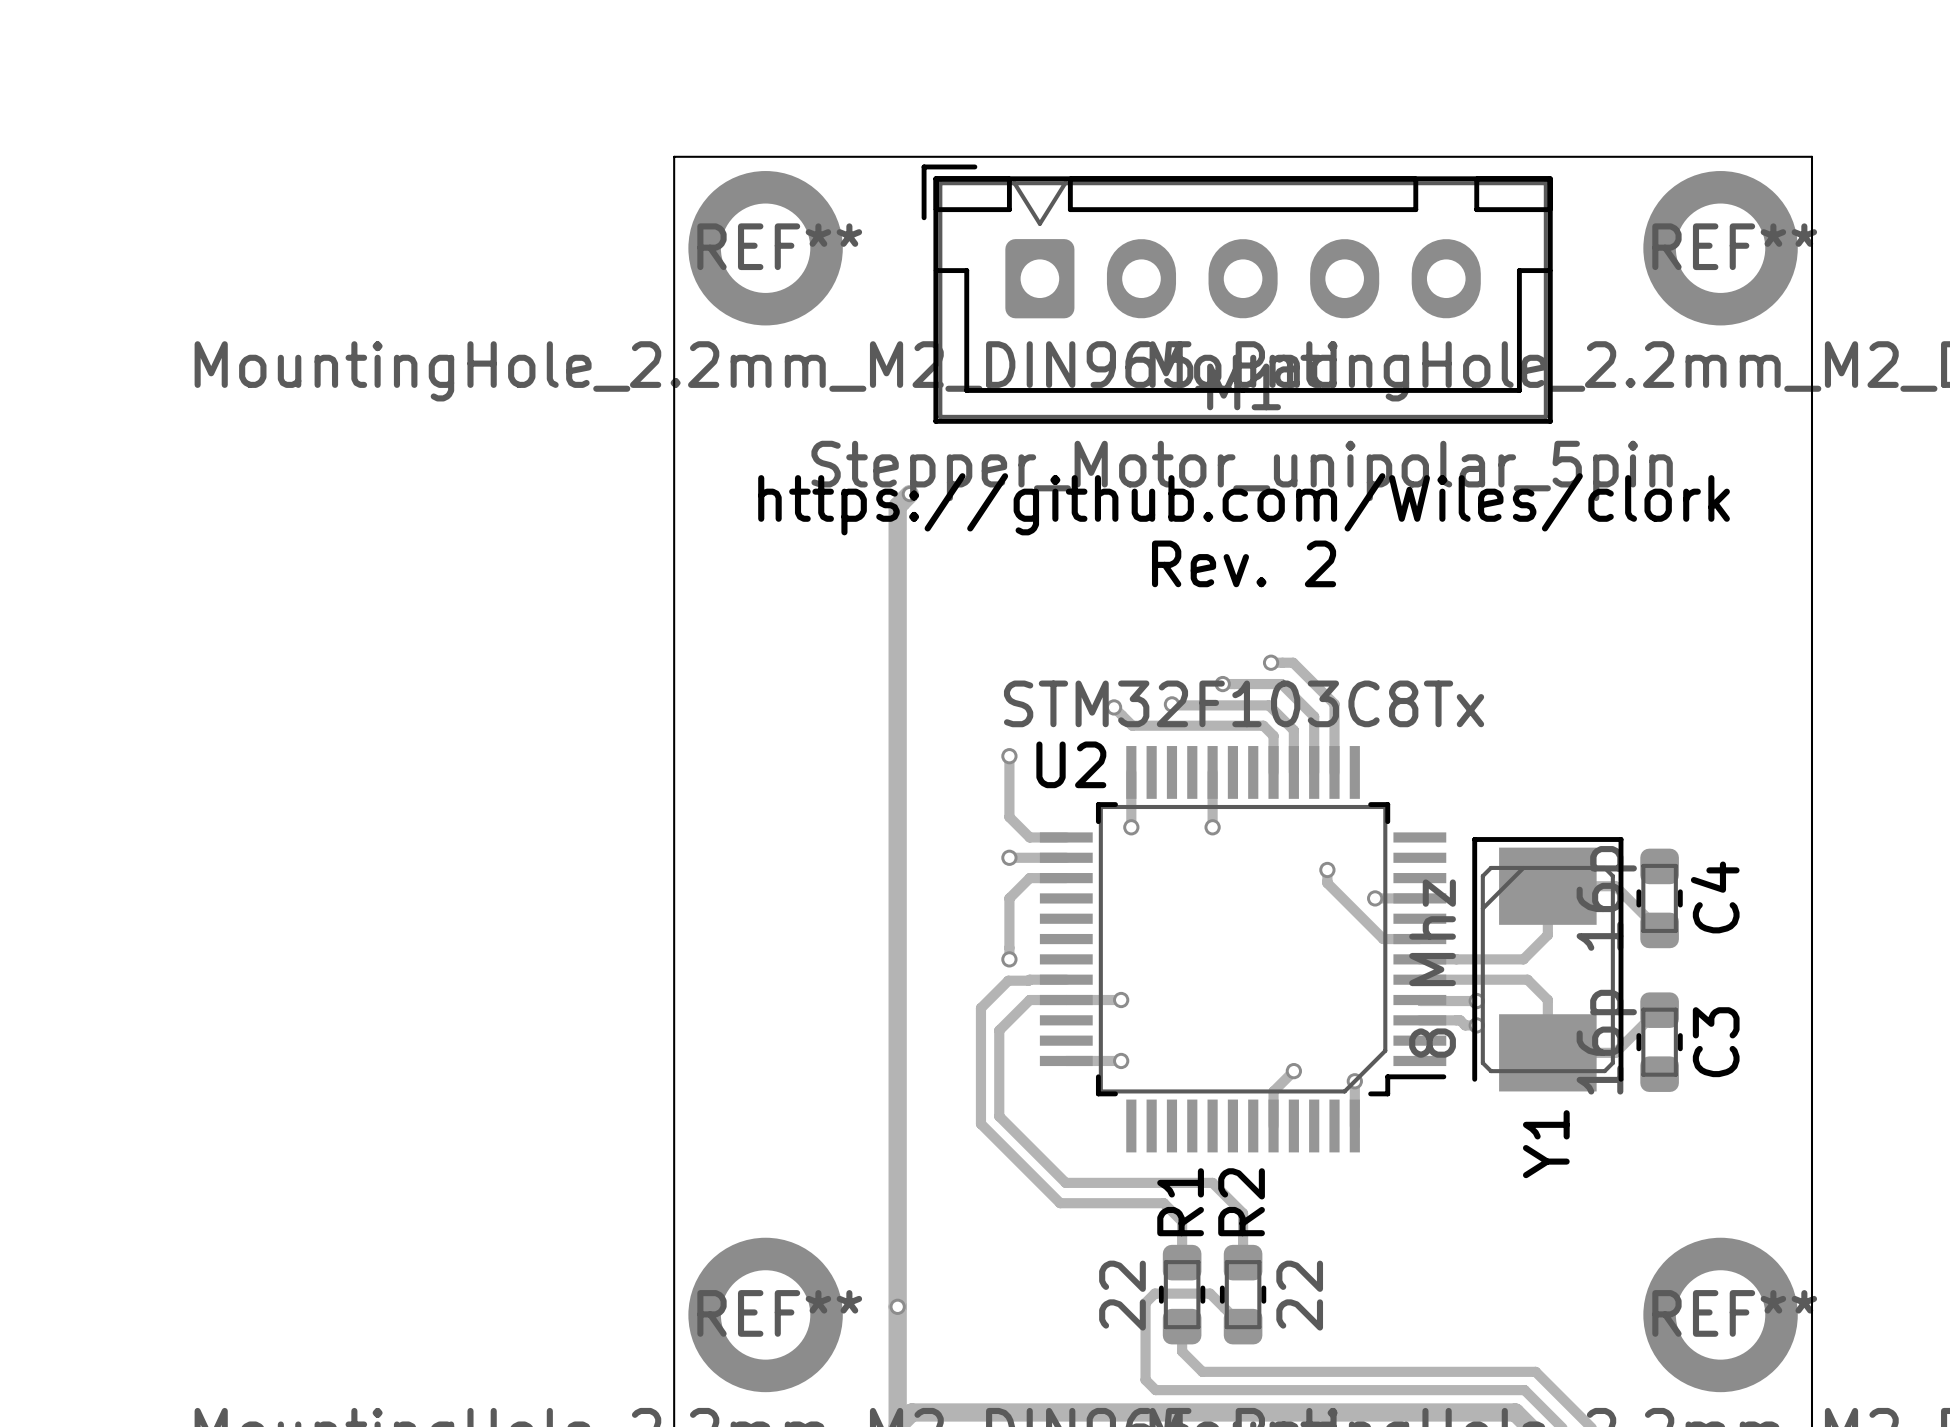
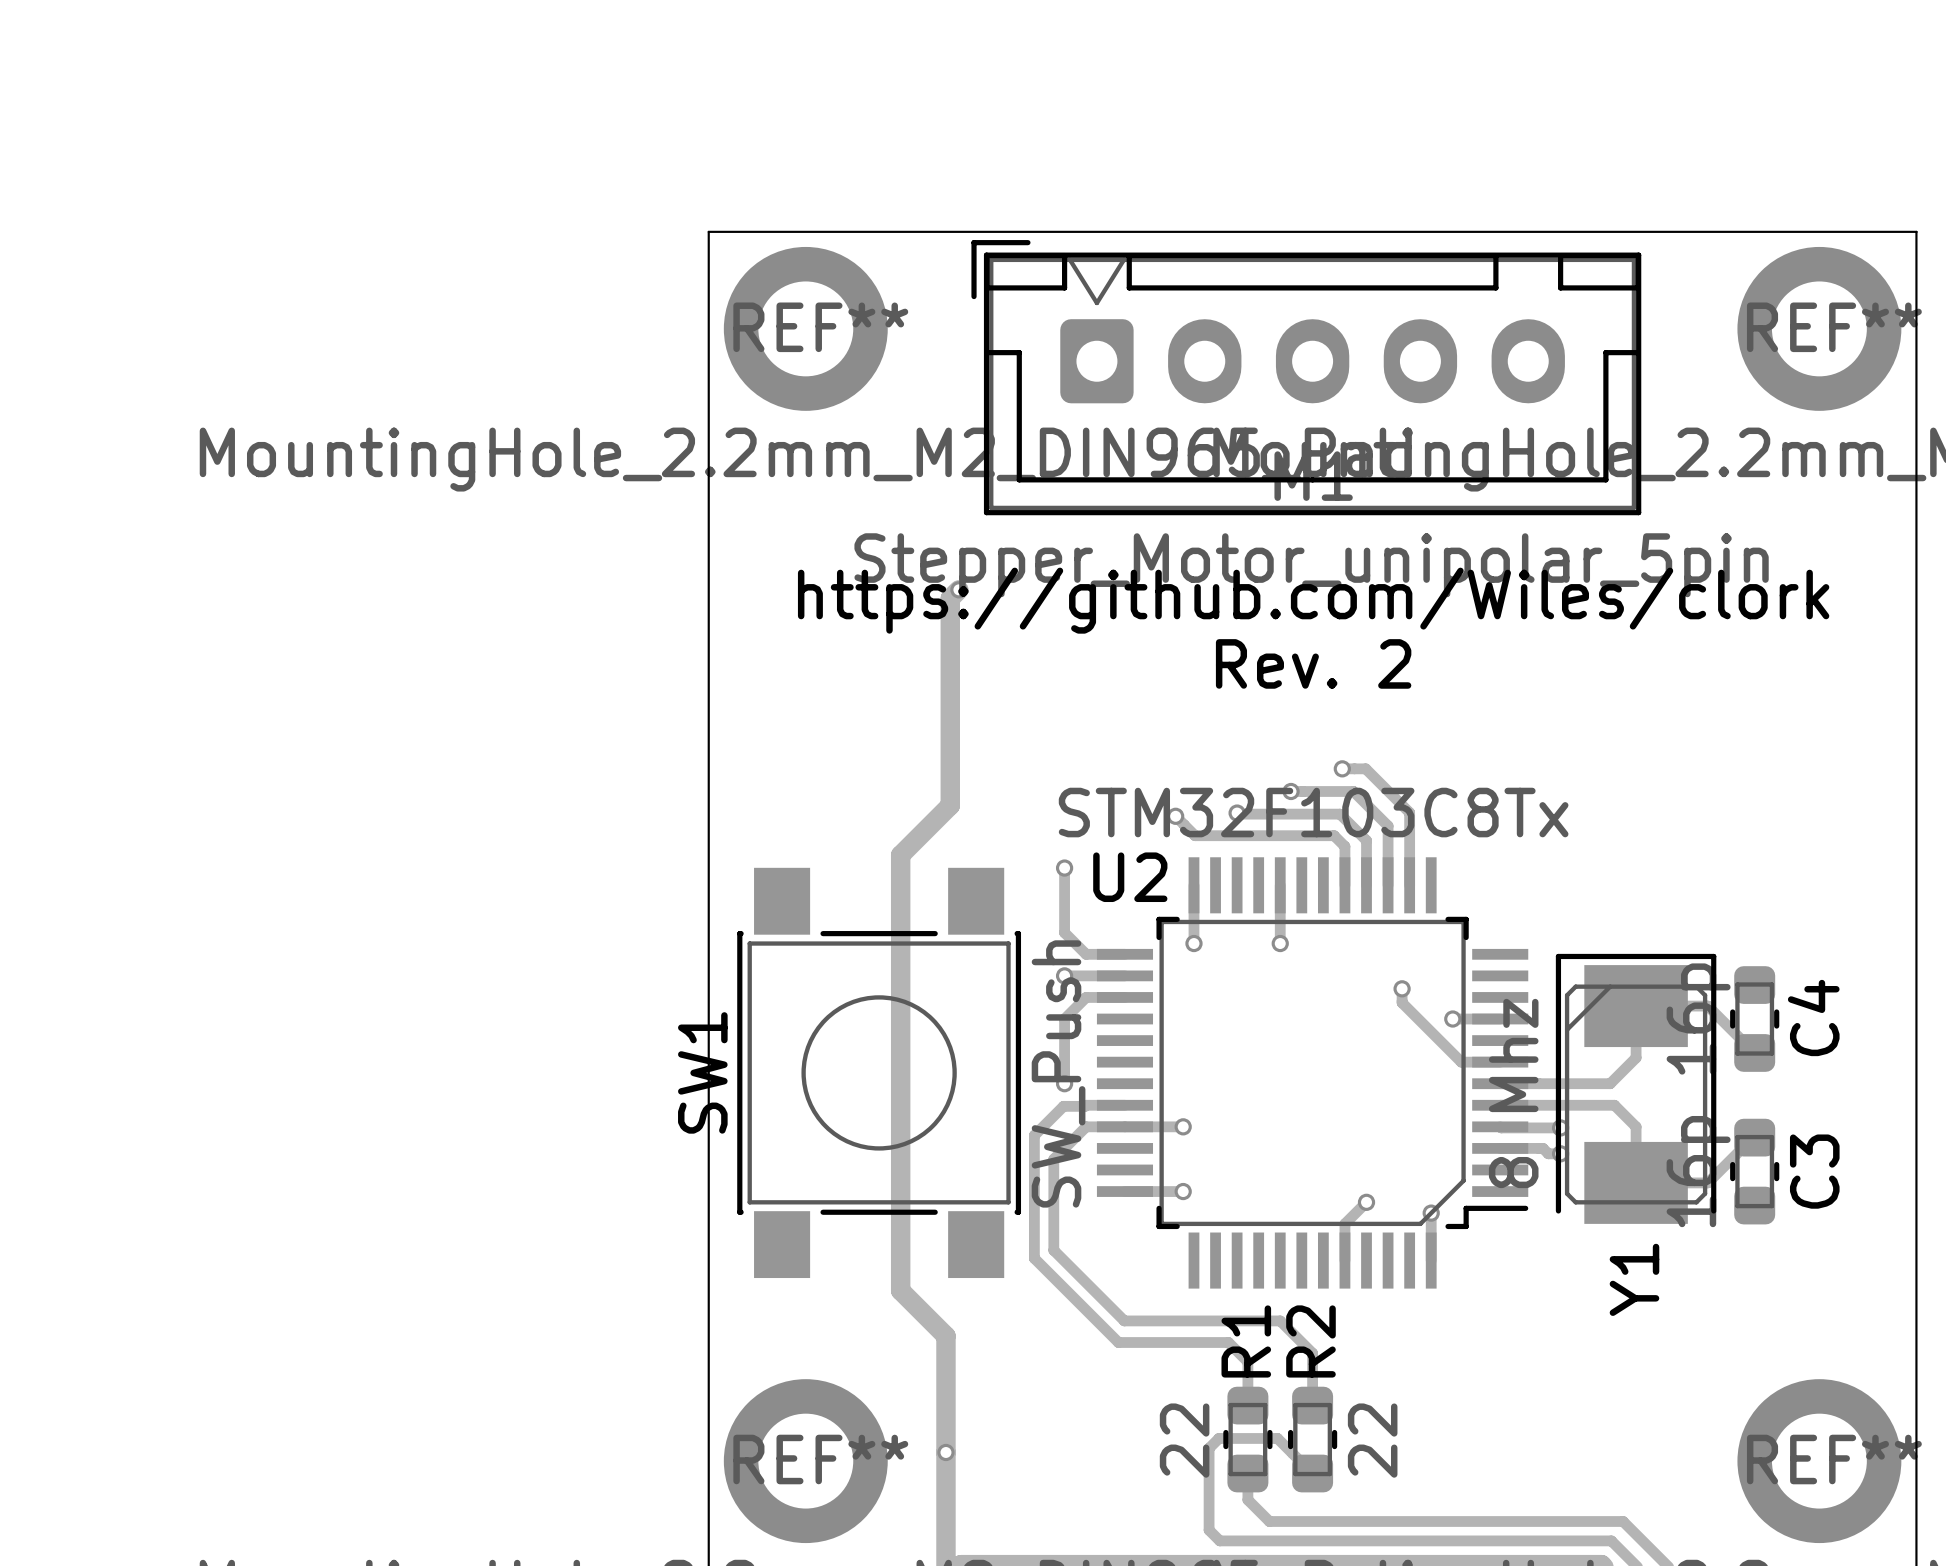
track: (901, 502) (897, 506) (897, 1197) -> (950, 598) (950, 805) (900, 855) (900, 1290) (945, 1336)
SW1: none -> SW_Push (879, 1072)

